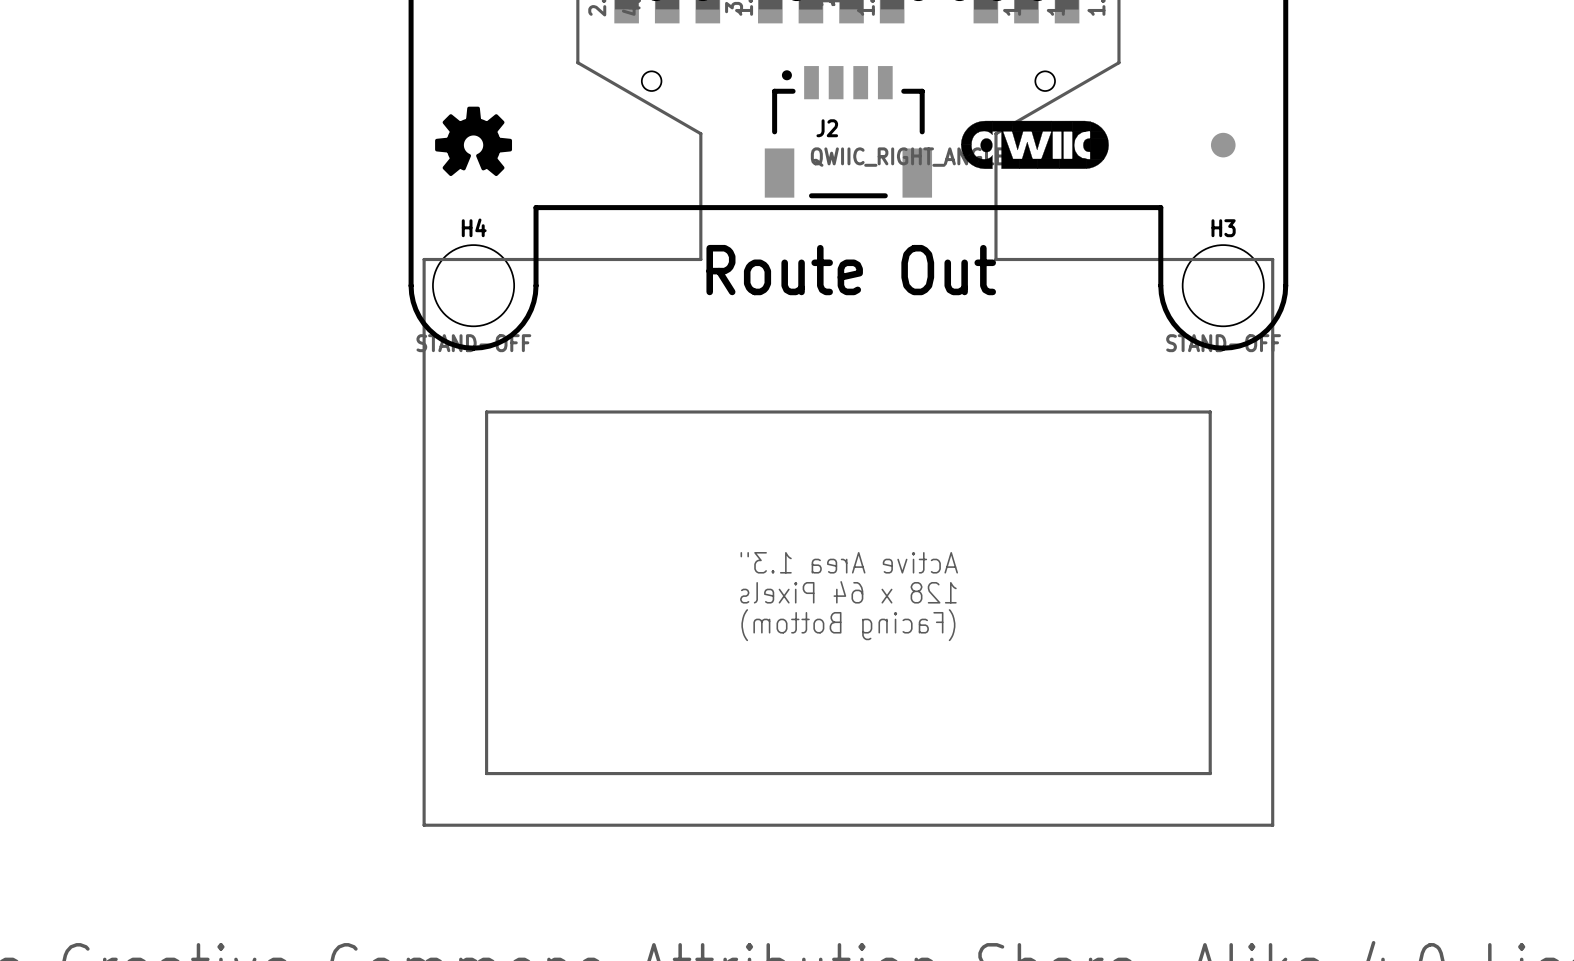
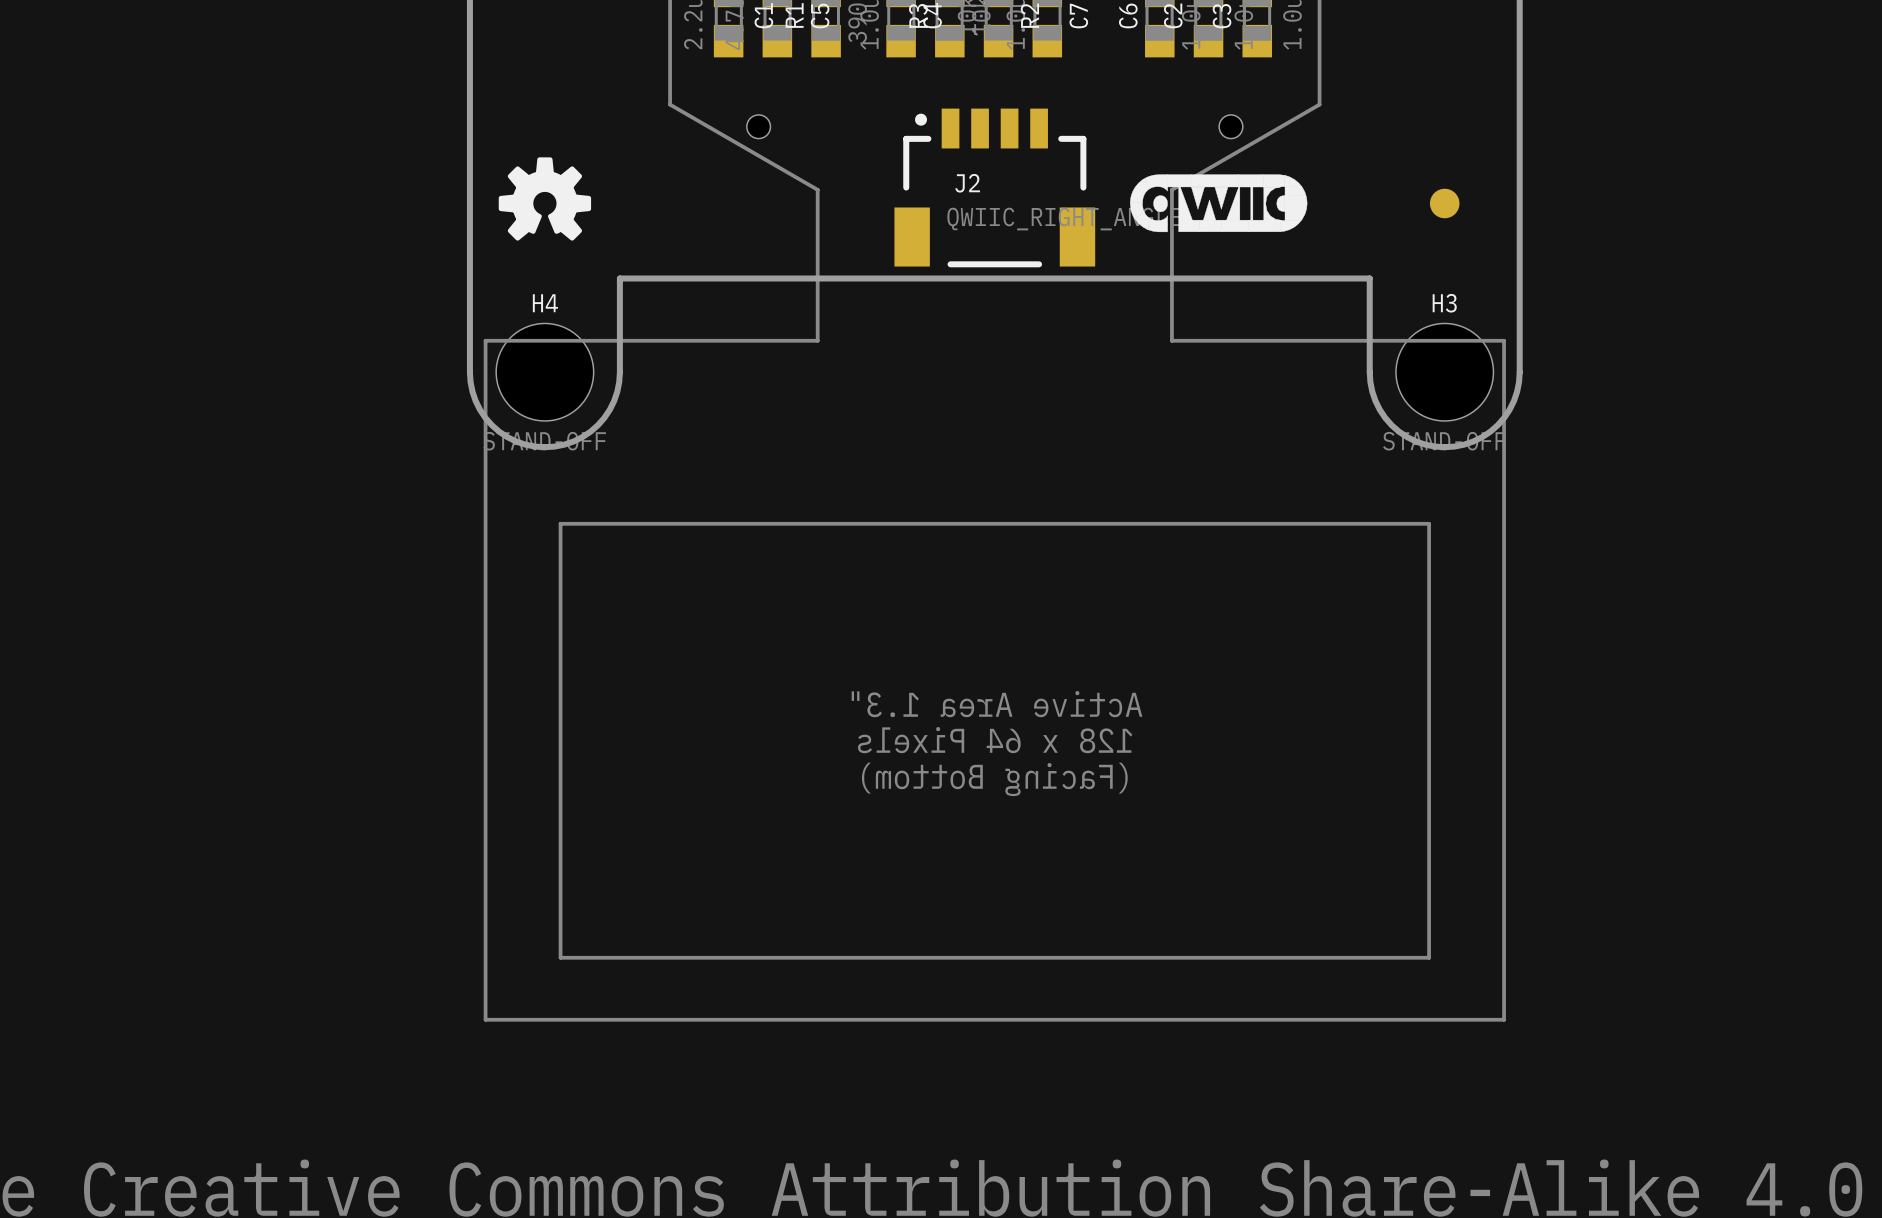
text: Route Out (851, 270) -> none

